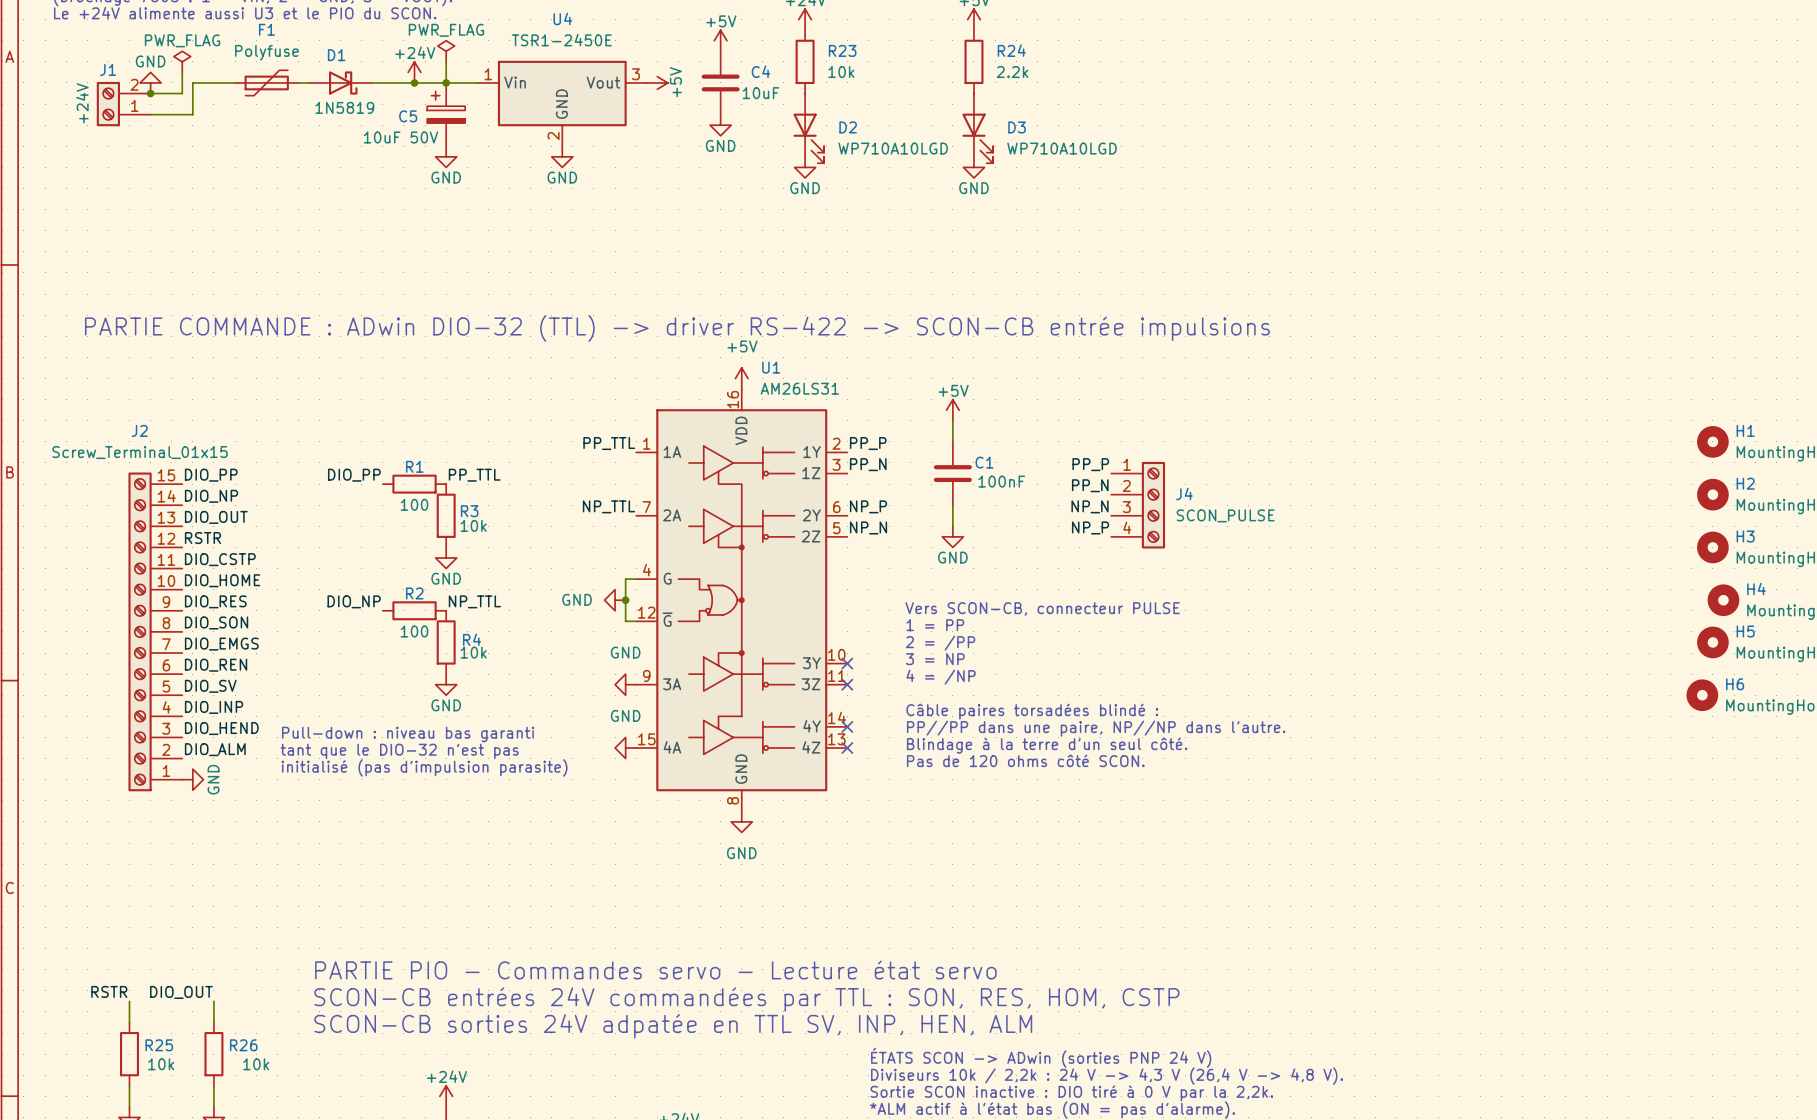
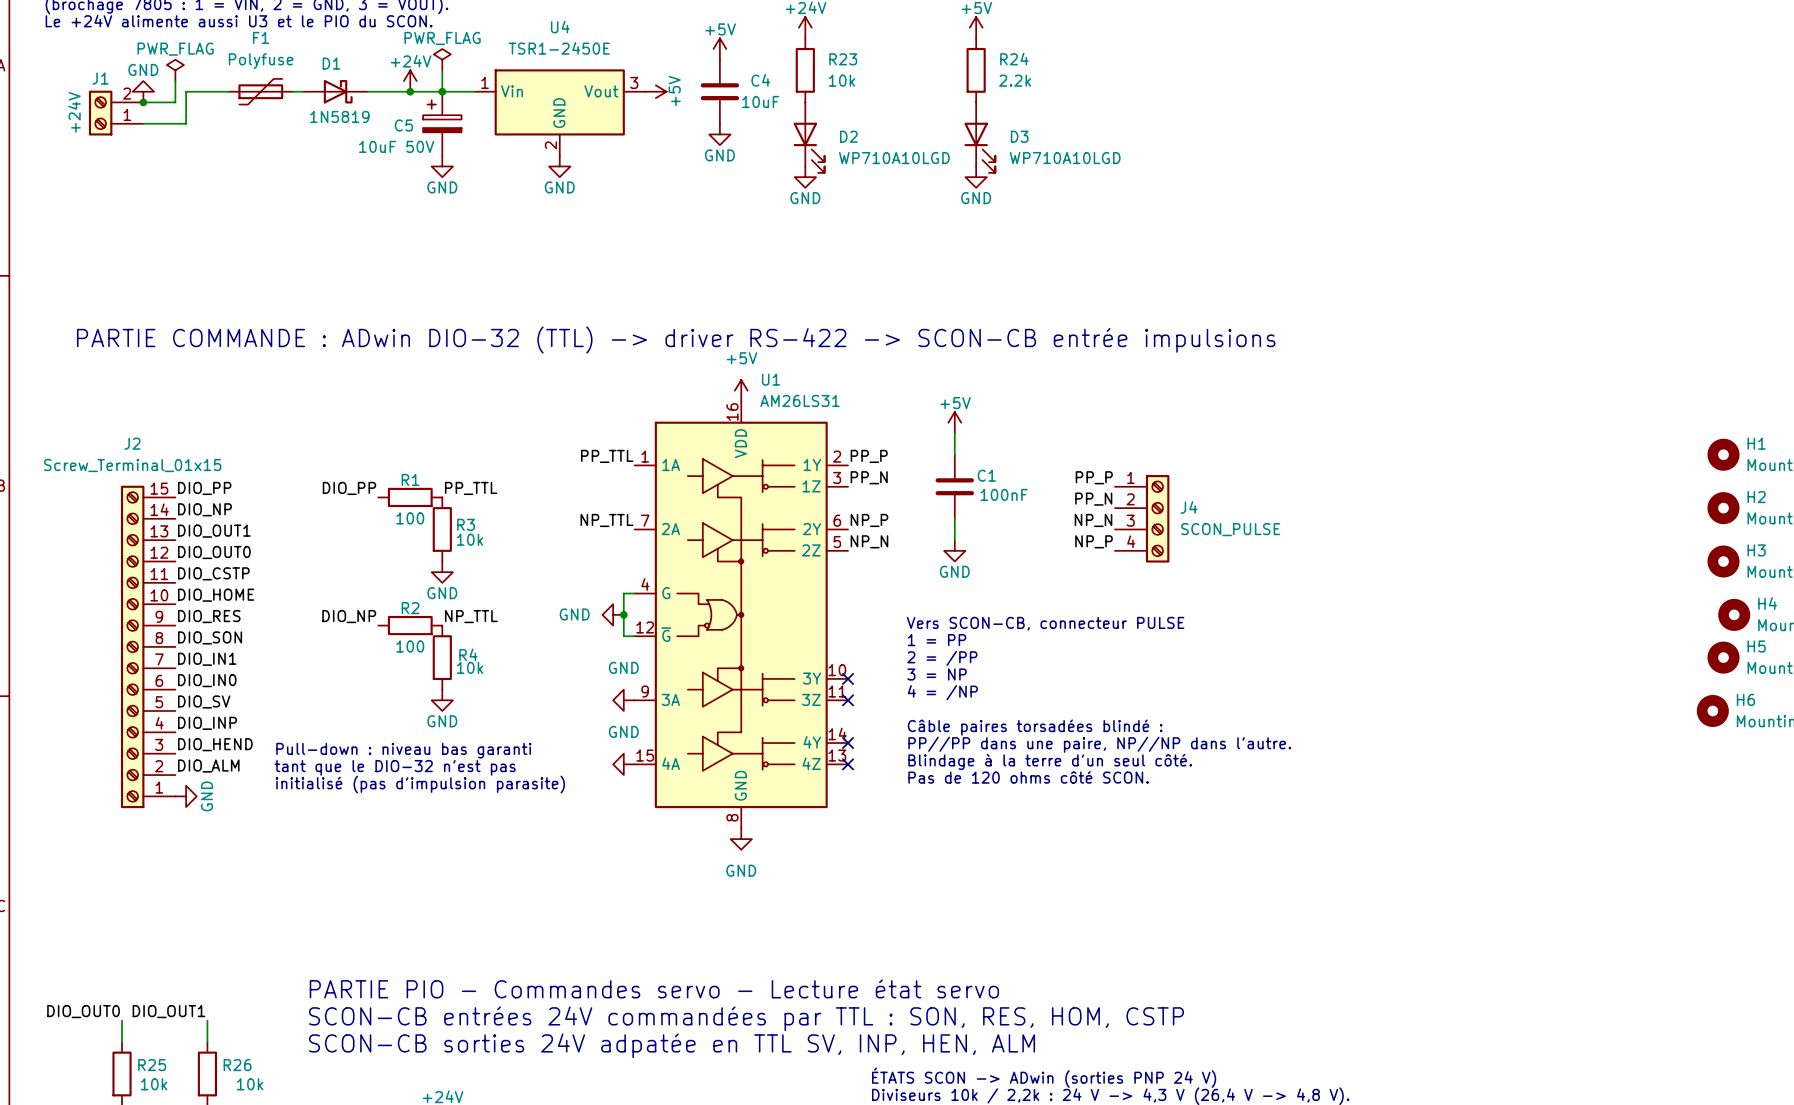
label: DIO_OUT (216, 517) -> DIO_OUT1 (214, 531)
label: RSTR (202, 538) -> DIO_OUT0 (214, 552)
label: DIO_EMGS (221, 644) -> DIO_IN1 (207, 659)
label: DIO_REN (216, 665) -> DIO_IN0 (207, 680)
label: RSTR (109, 991) -> DIO_OUT0 (83, 1011)
label: DIO_OUT (181, 992) -> DIO_OUT1 (168, 1011)

